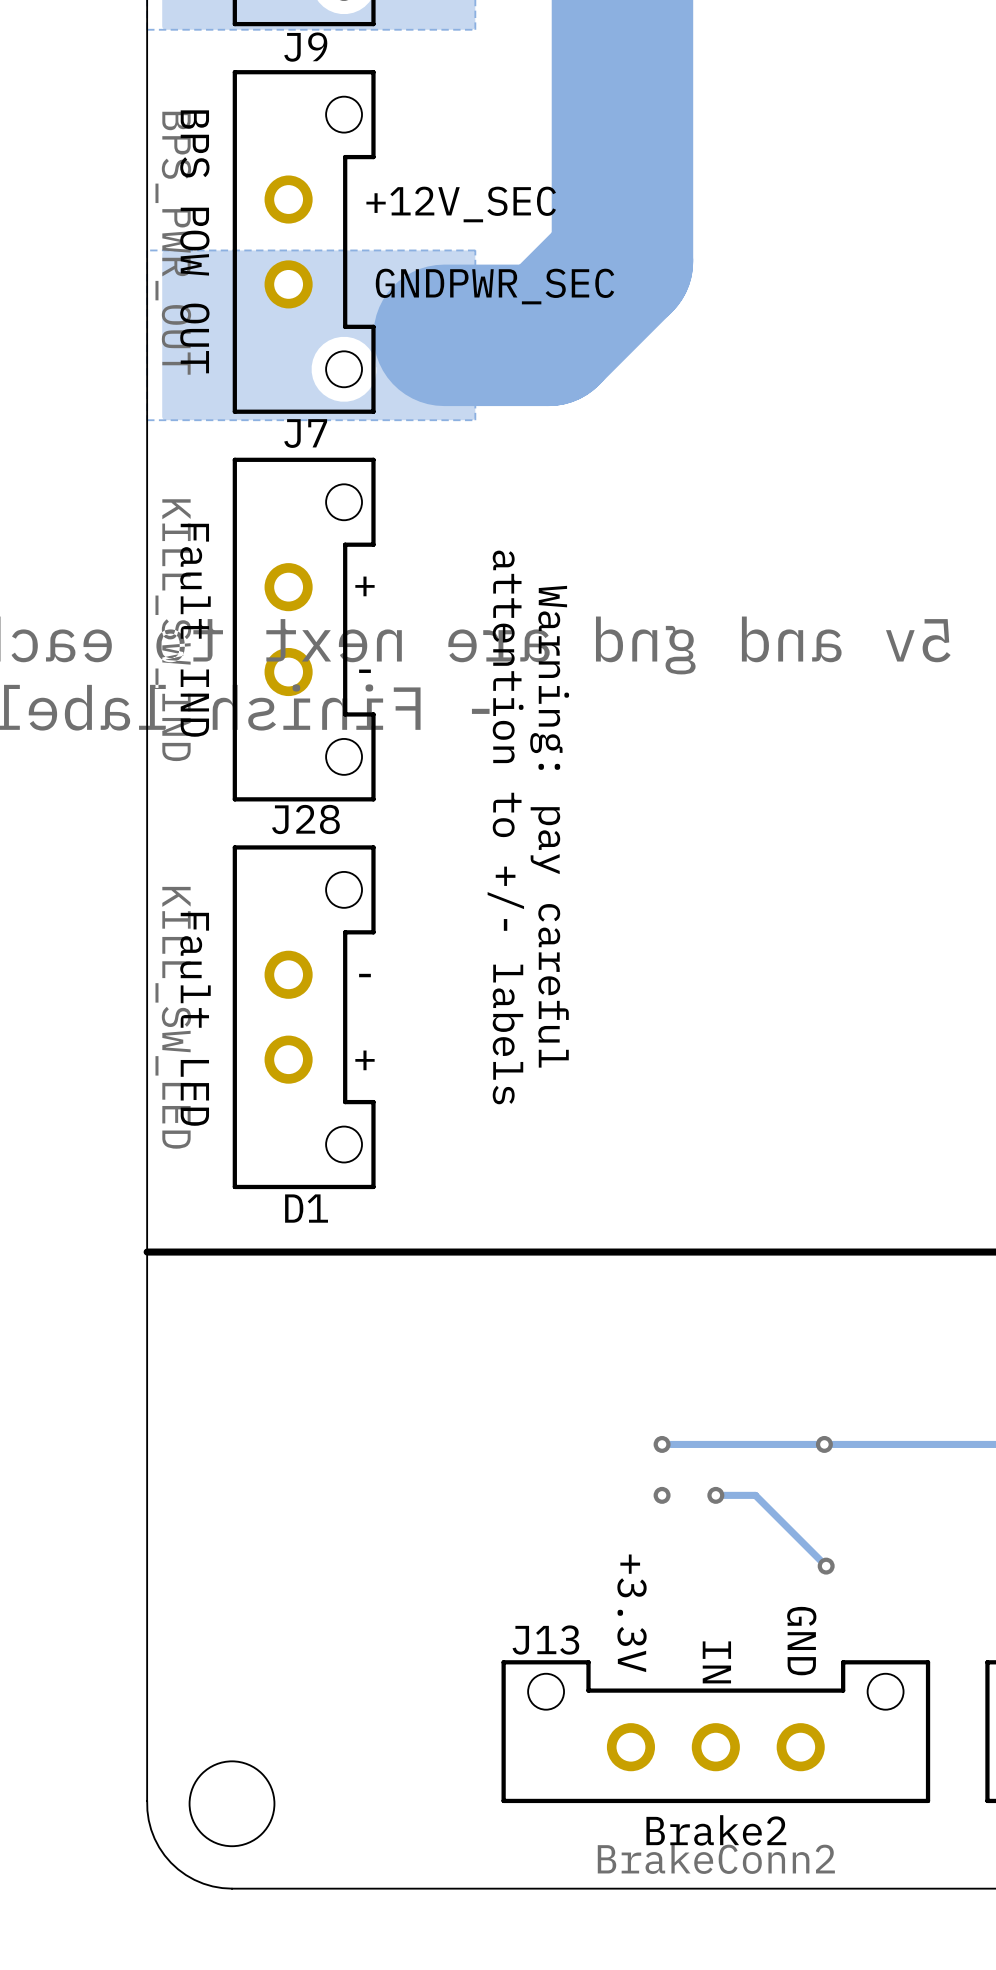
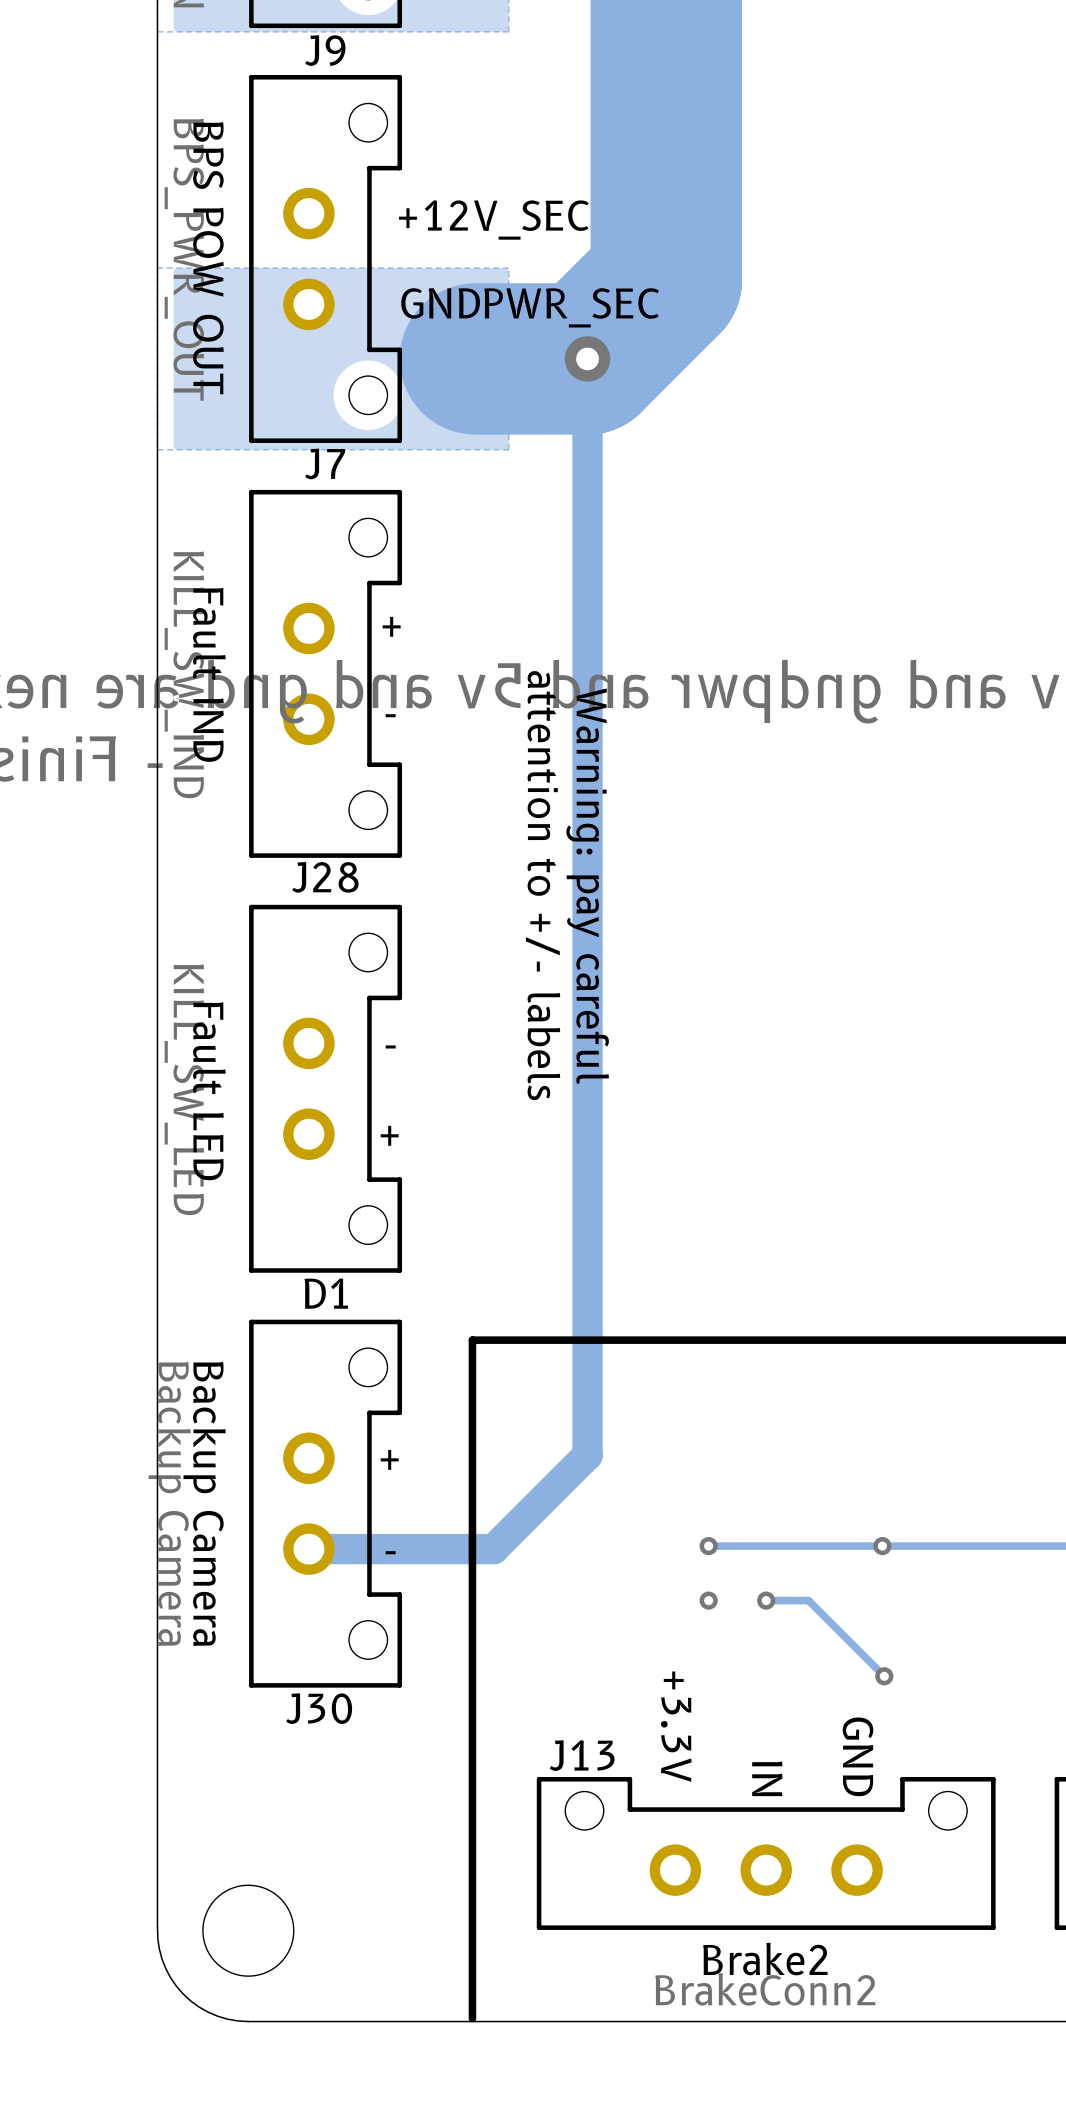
track: none -> (587, 358) (587, 1455) (493, 1549) (308, 1549)
via: none -> (587, 358)
line: (441, 1252) (147, 1252) -> (472, 1340) (472, 2018)
text: none -> + (389, 1459)
J30: none -> Backup Camera (325, 1503)
text: none -> Backup Camera (204, 1503)
text: none -> - (390, 1552)

